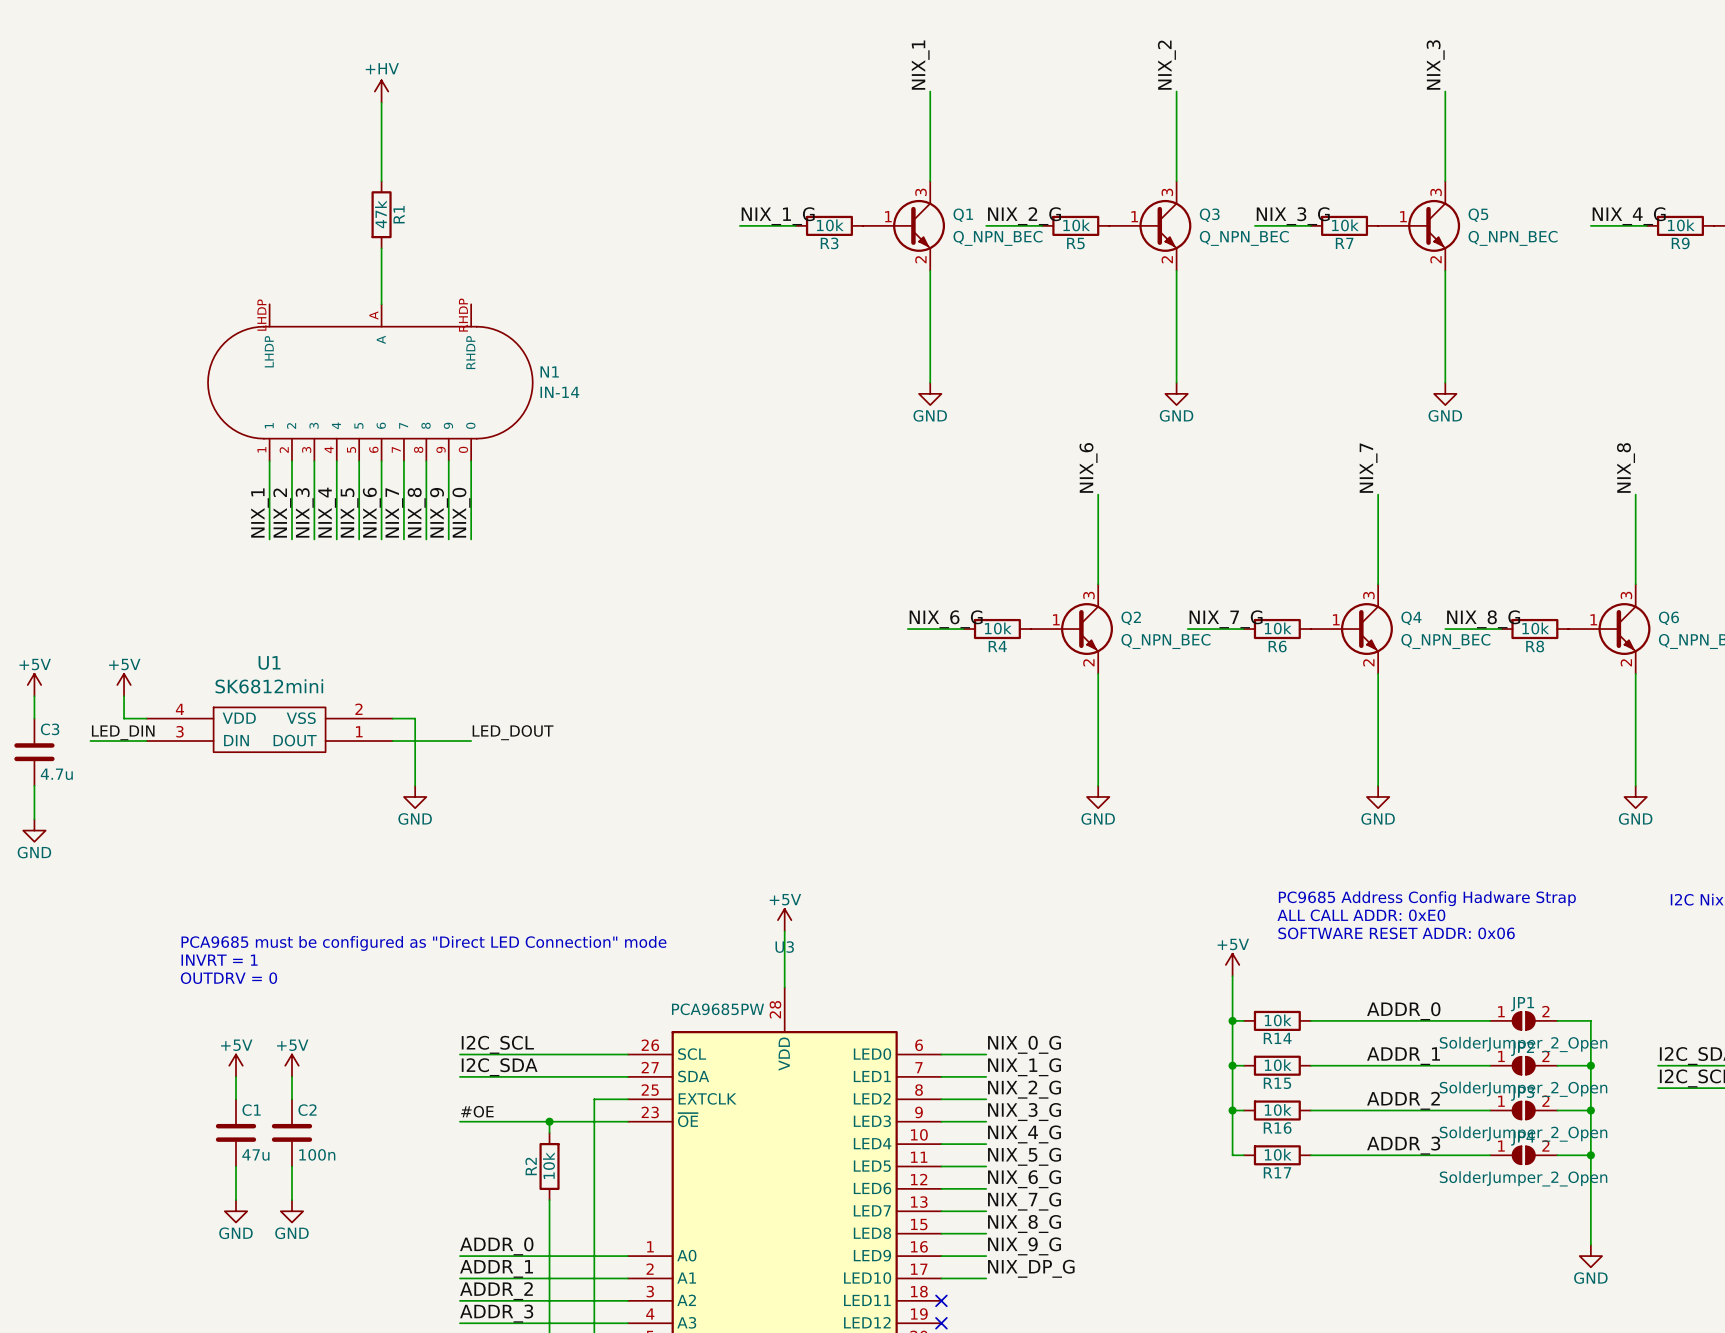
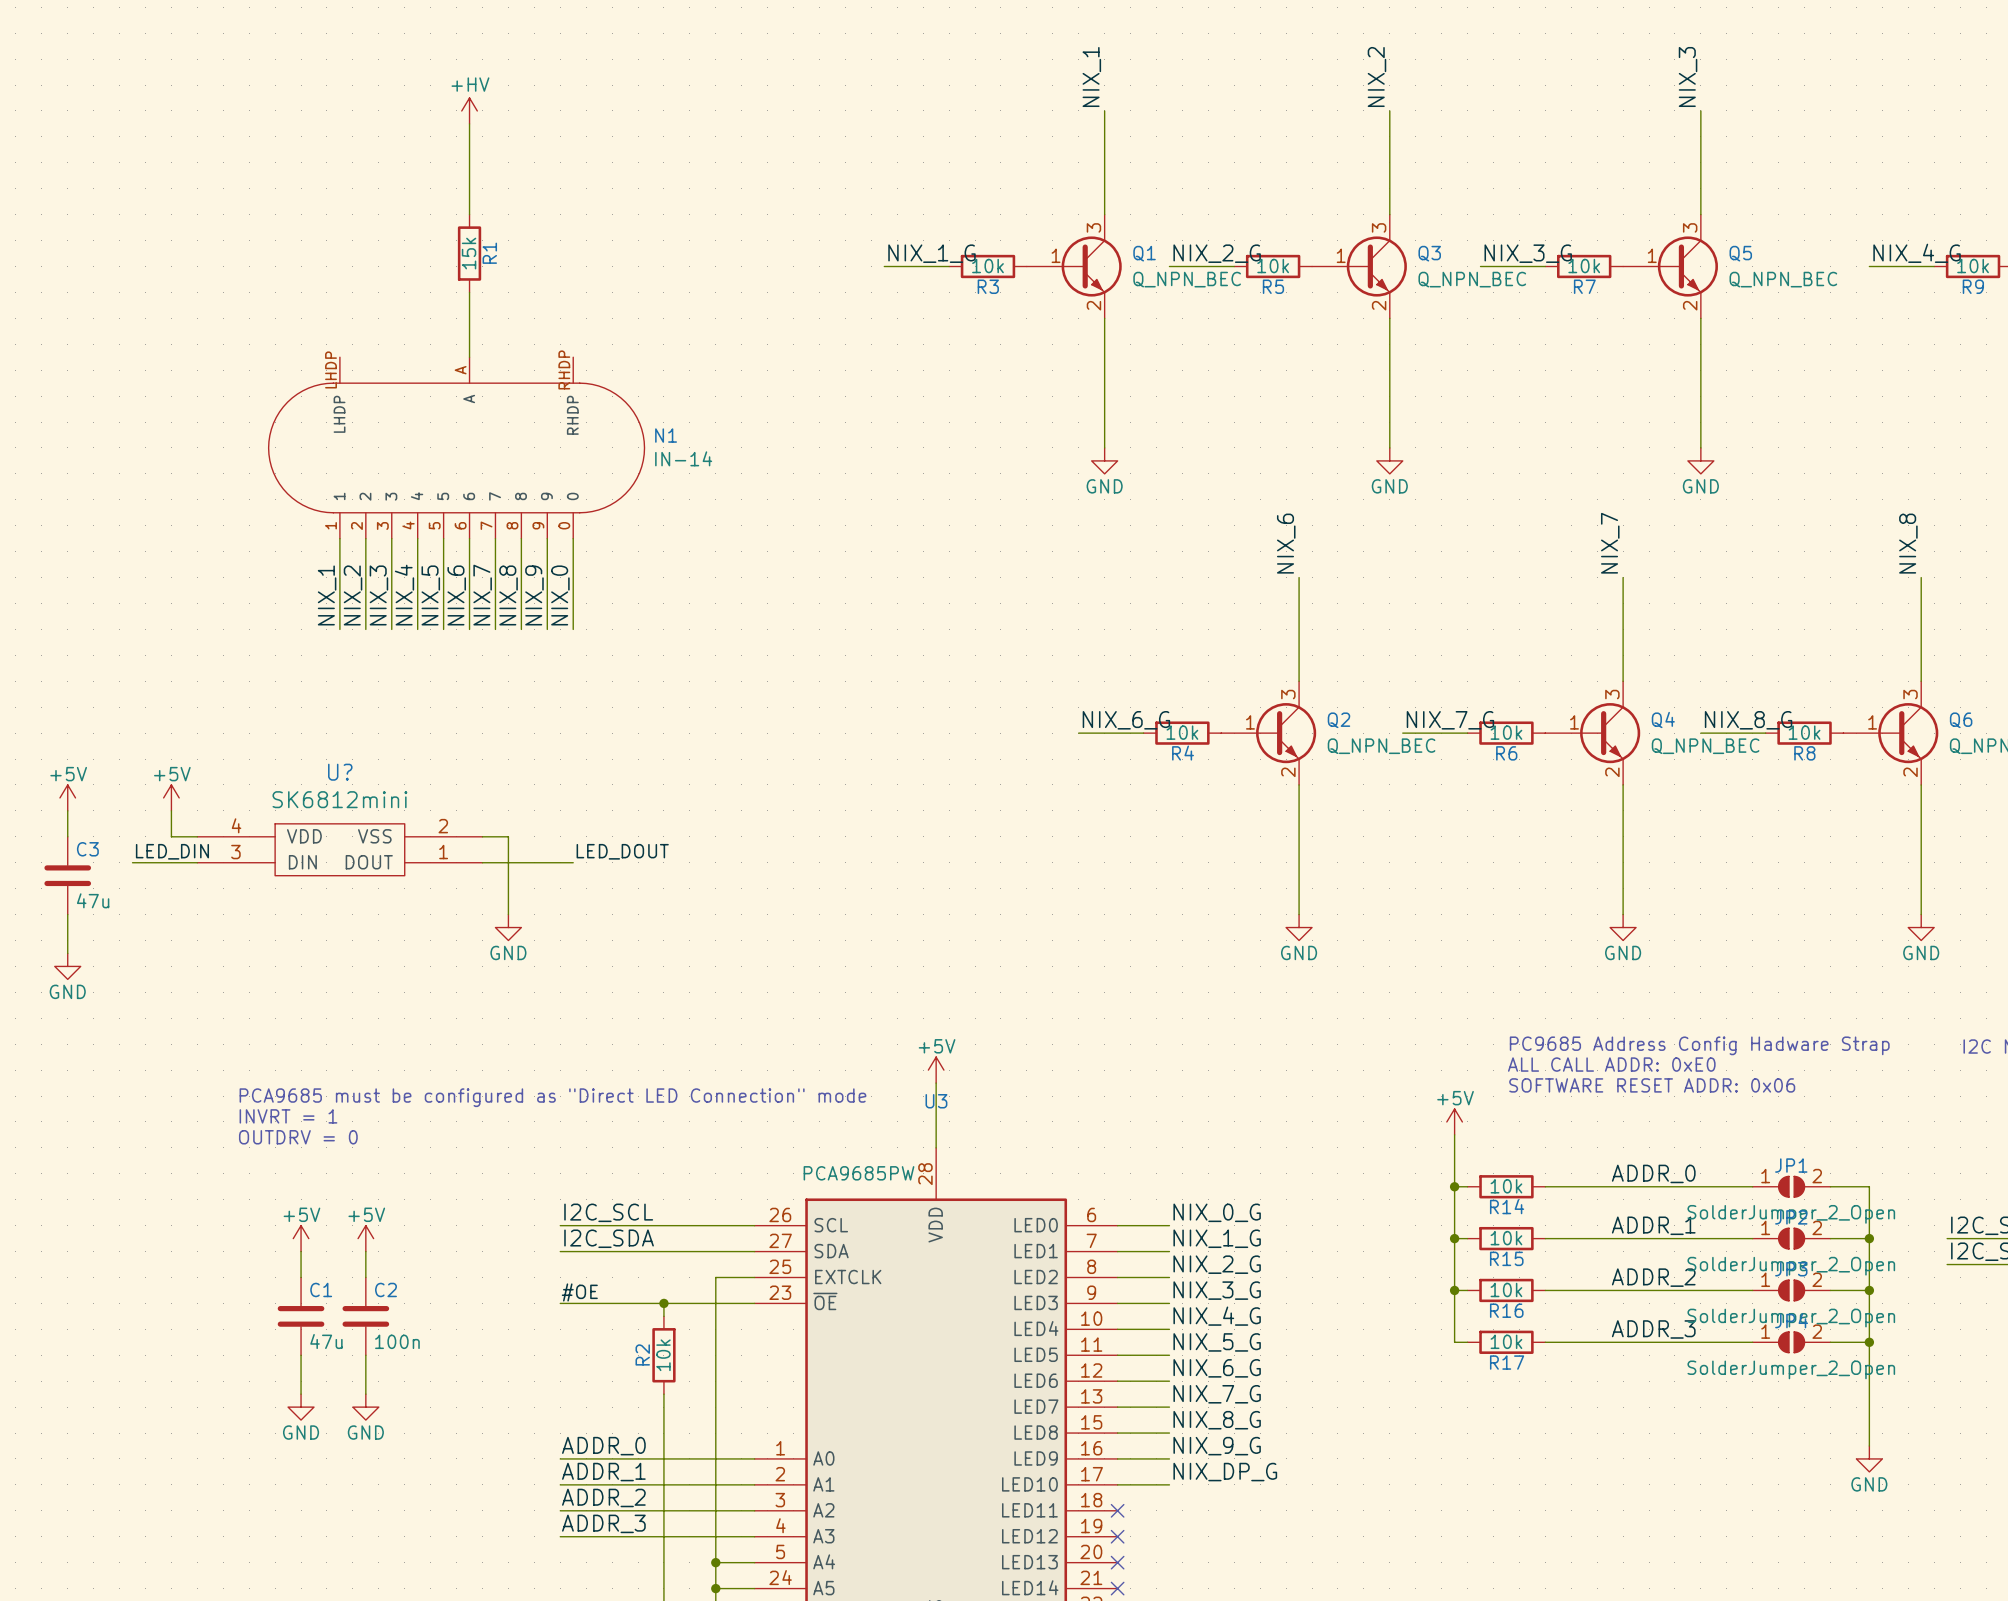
R1 value: 47k (380, 214) -> 15k (469, 253)
U1 name: U1 (269, 662) -> U? (340, 772)
C3 value: 4.7u (56, 774) -> 47u (93, 900)

